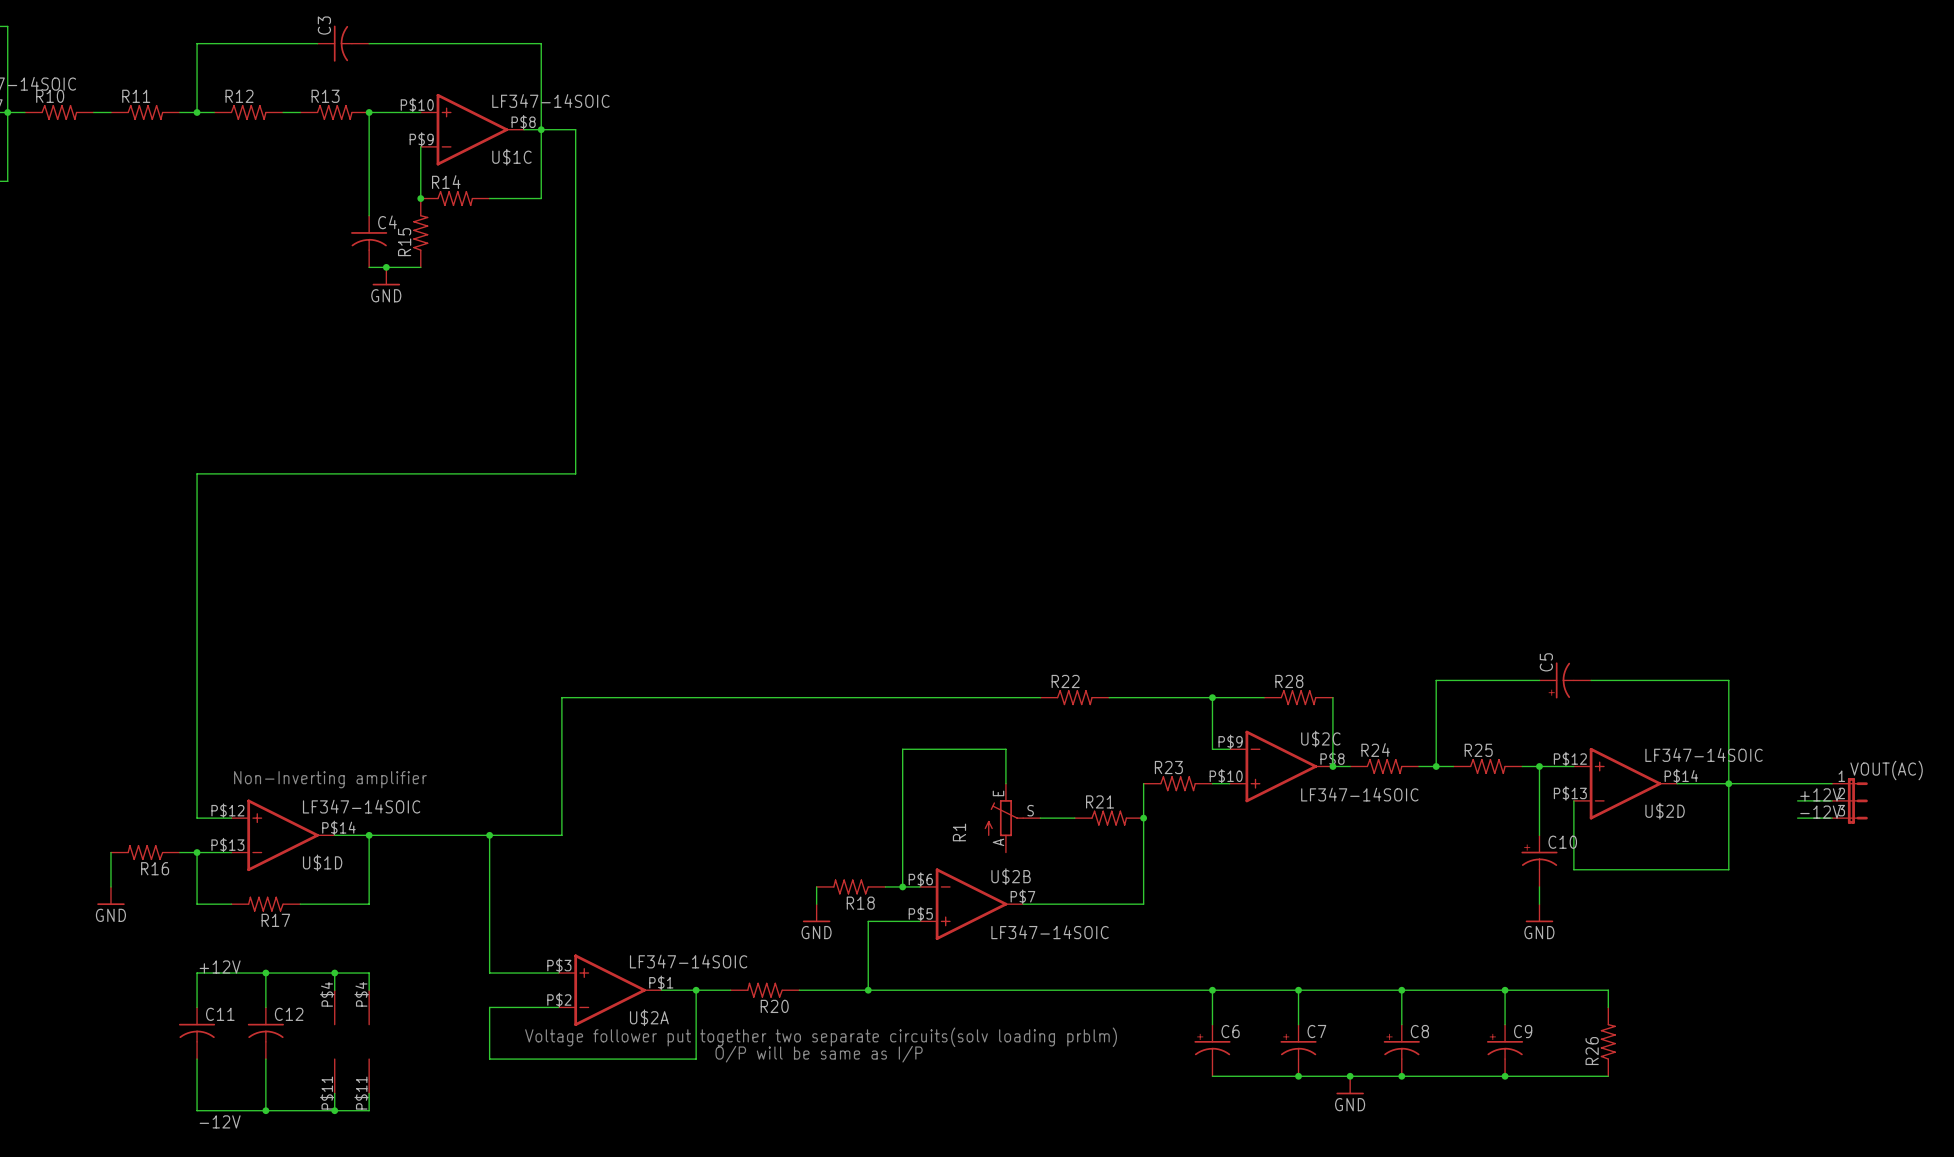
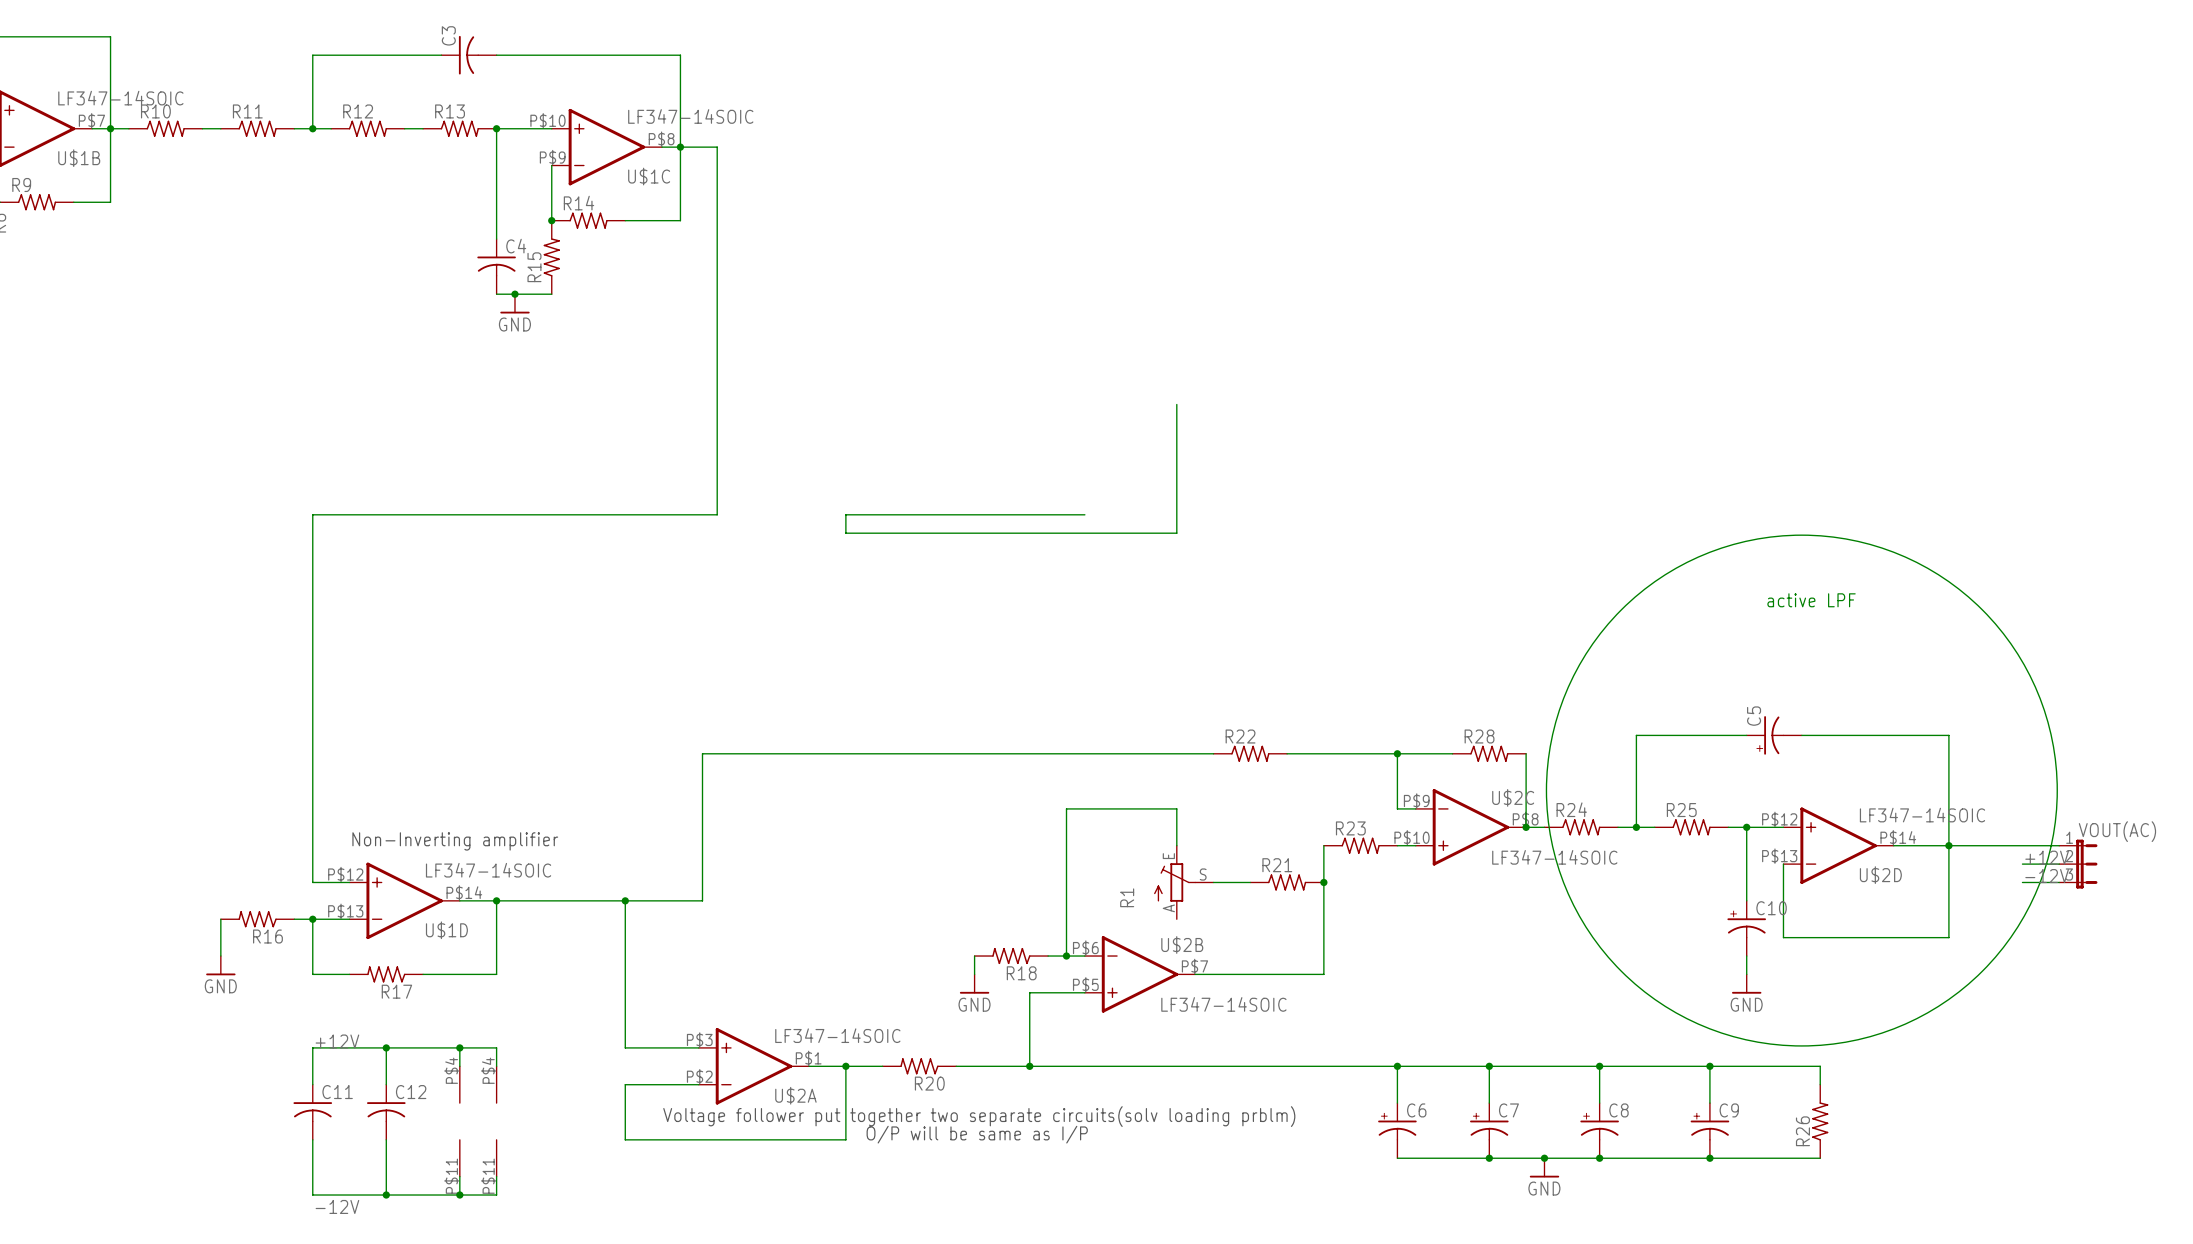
wire: none -> (1176, 404) (1176, 533) (845, 533) (845, 514) (1084, 514)
drawing: none -> [1545, 534, 2058, 1047]
text: none -> active LPF (1811, 600)

